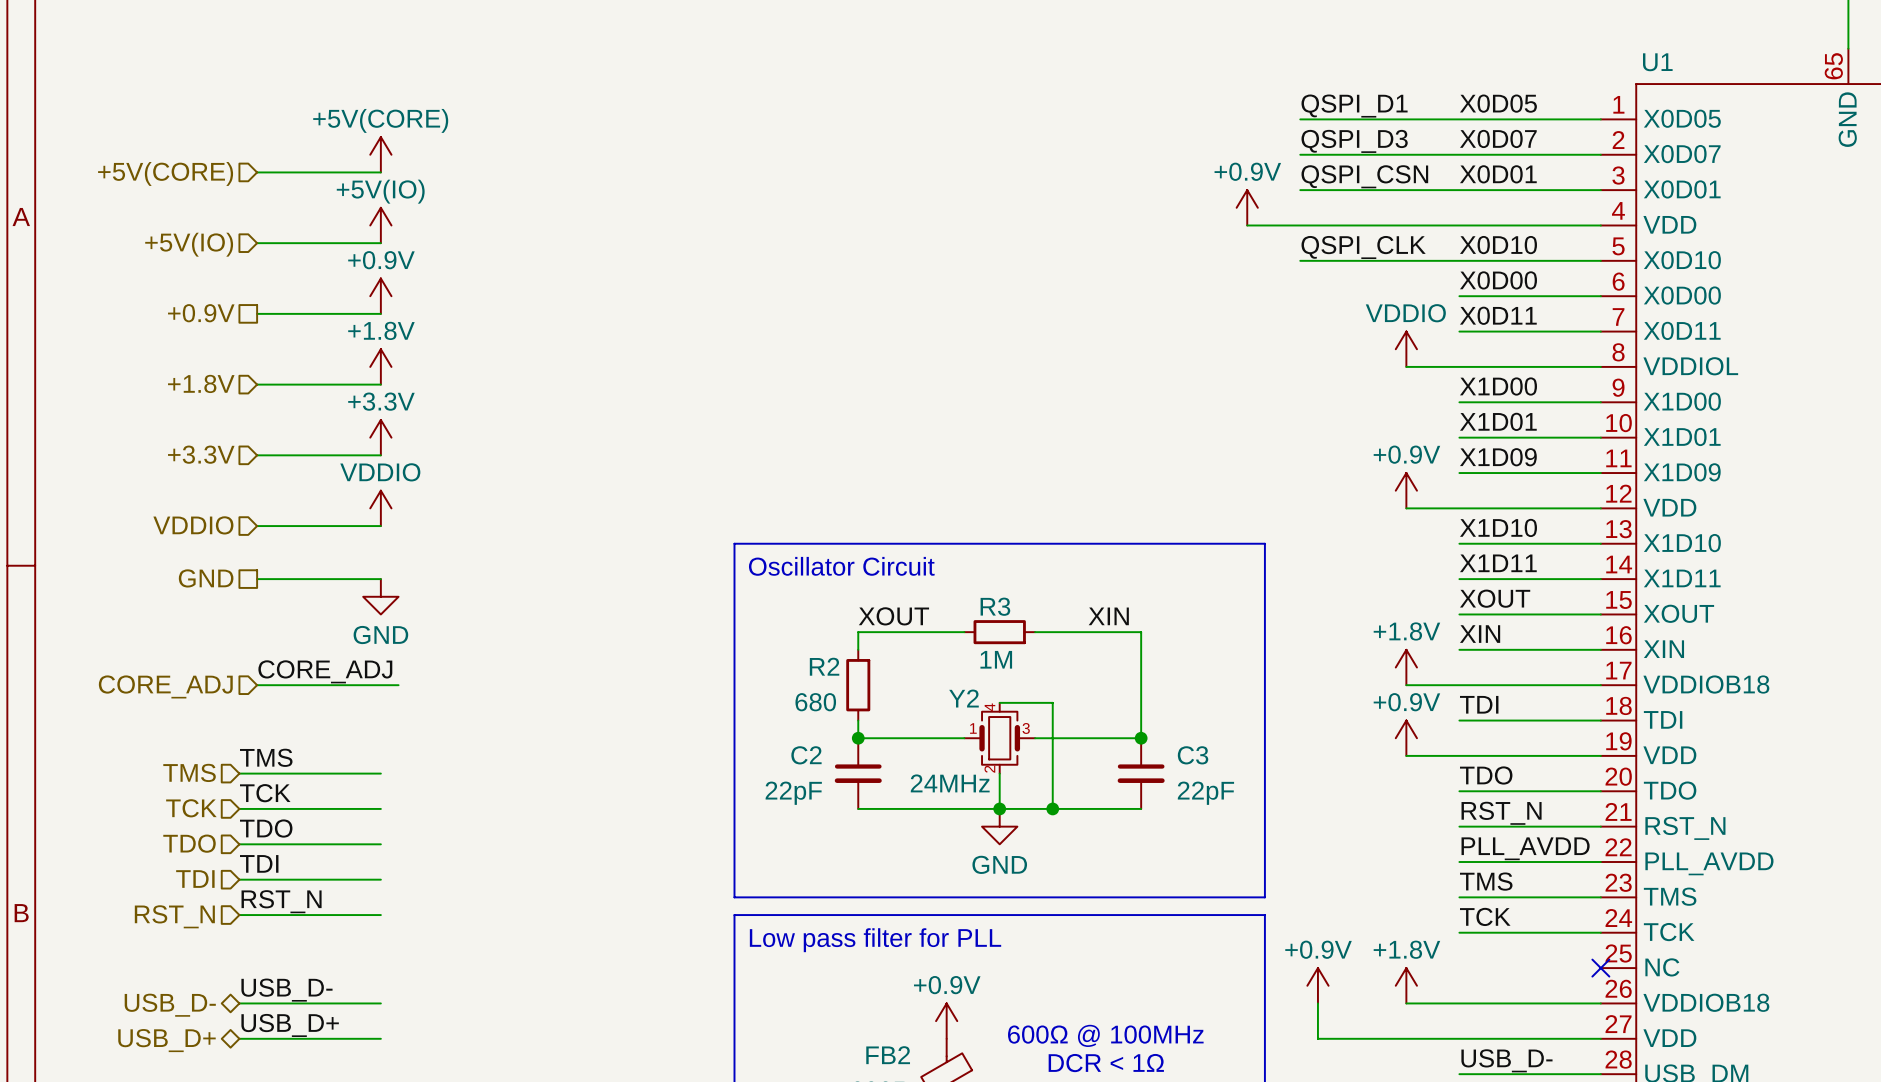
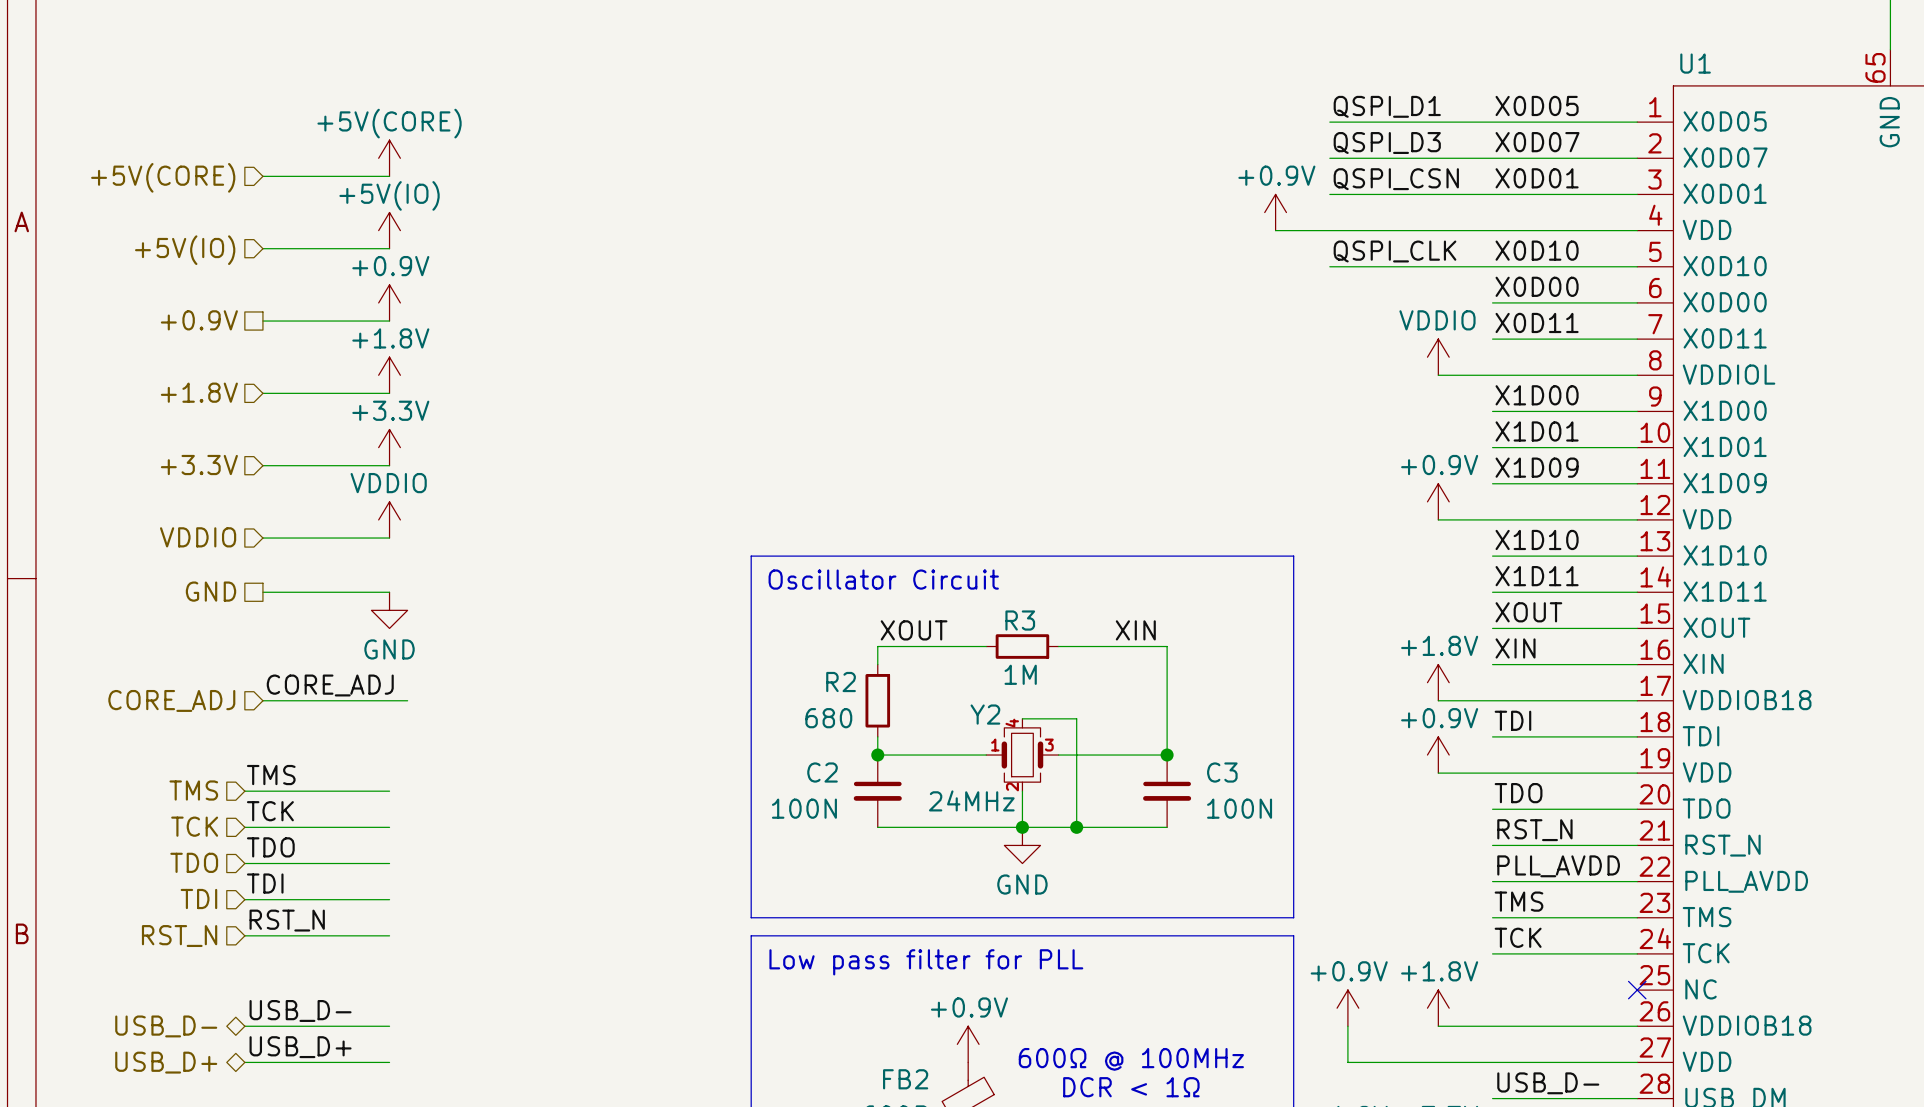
C2 value: 22pF (793, 793) -> 100N (804, 808)
C3 value: 22pF (1205, 793) -> 100N (1239, 808)

